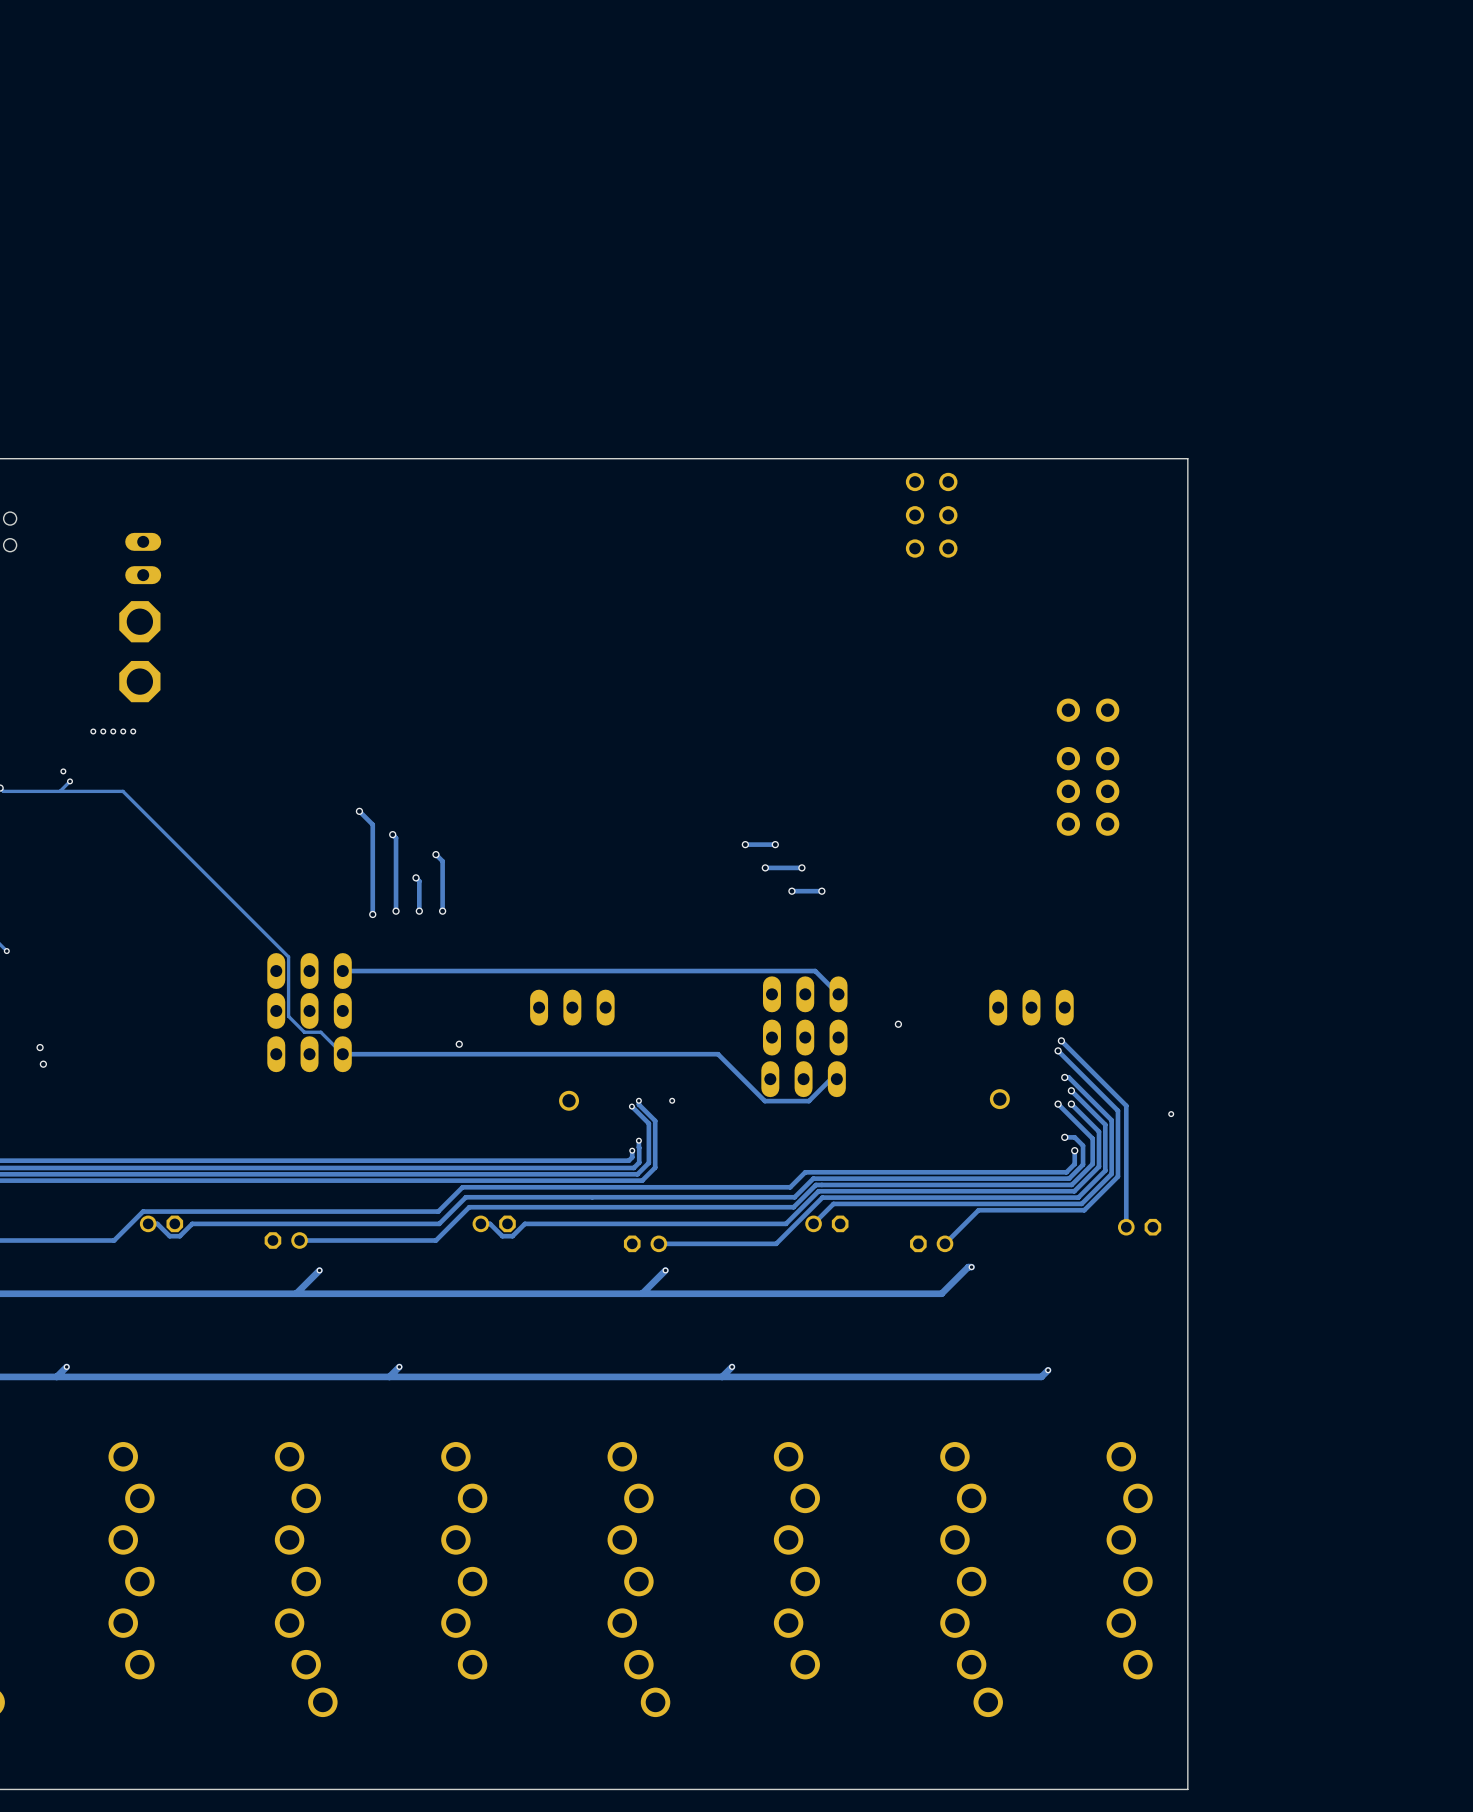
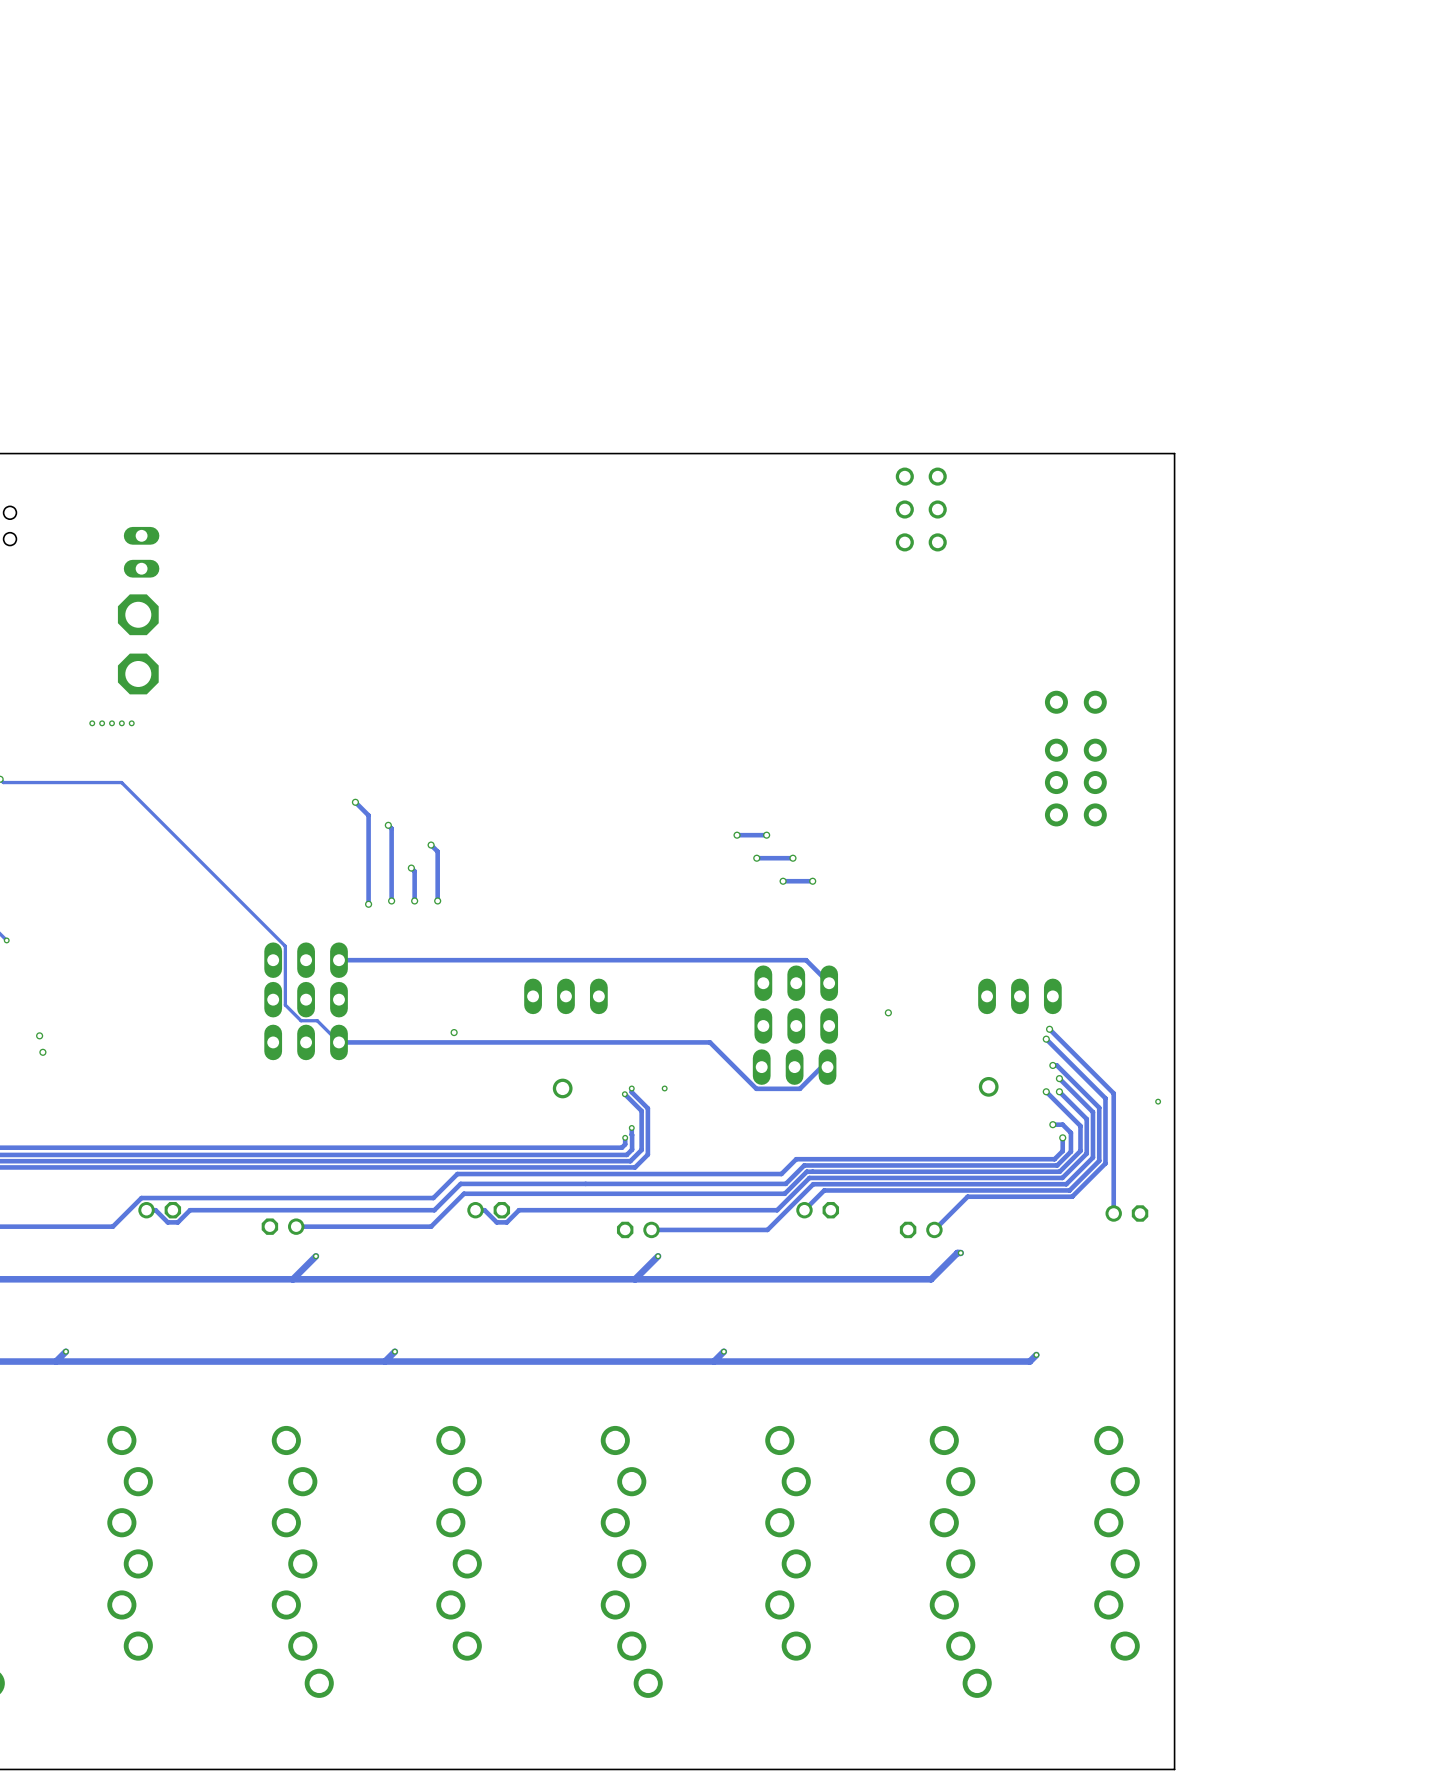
via: (63, 771) -> none
track: (70, 781) (60, 791) -> none
via: (70, 781) -> none

